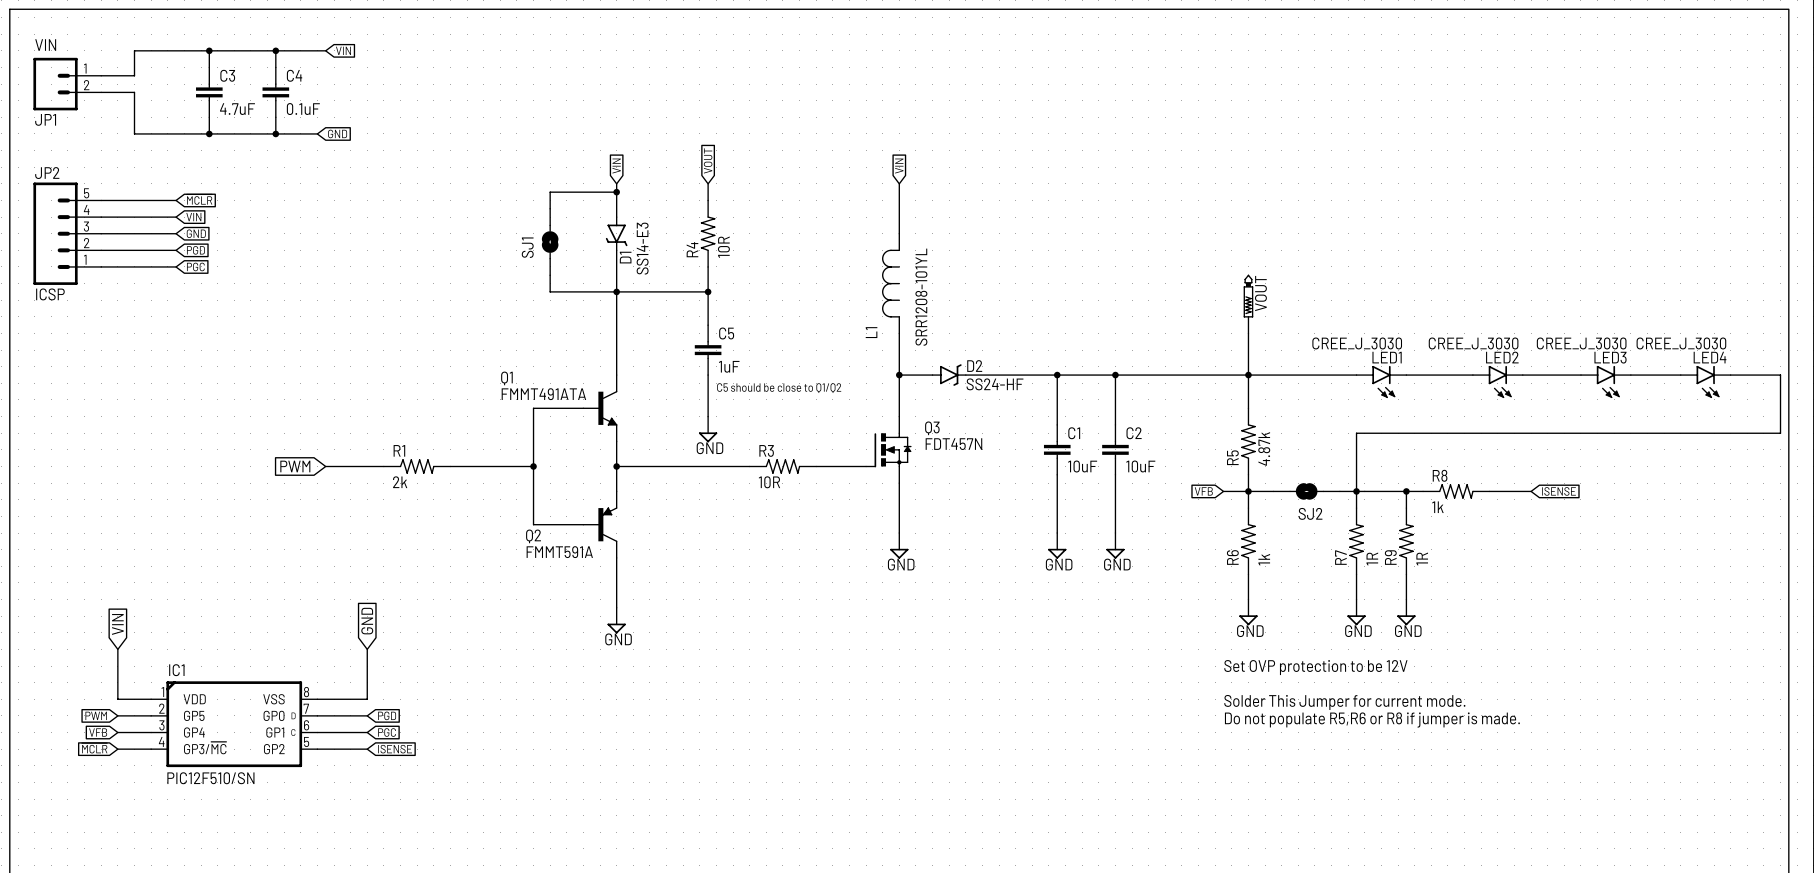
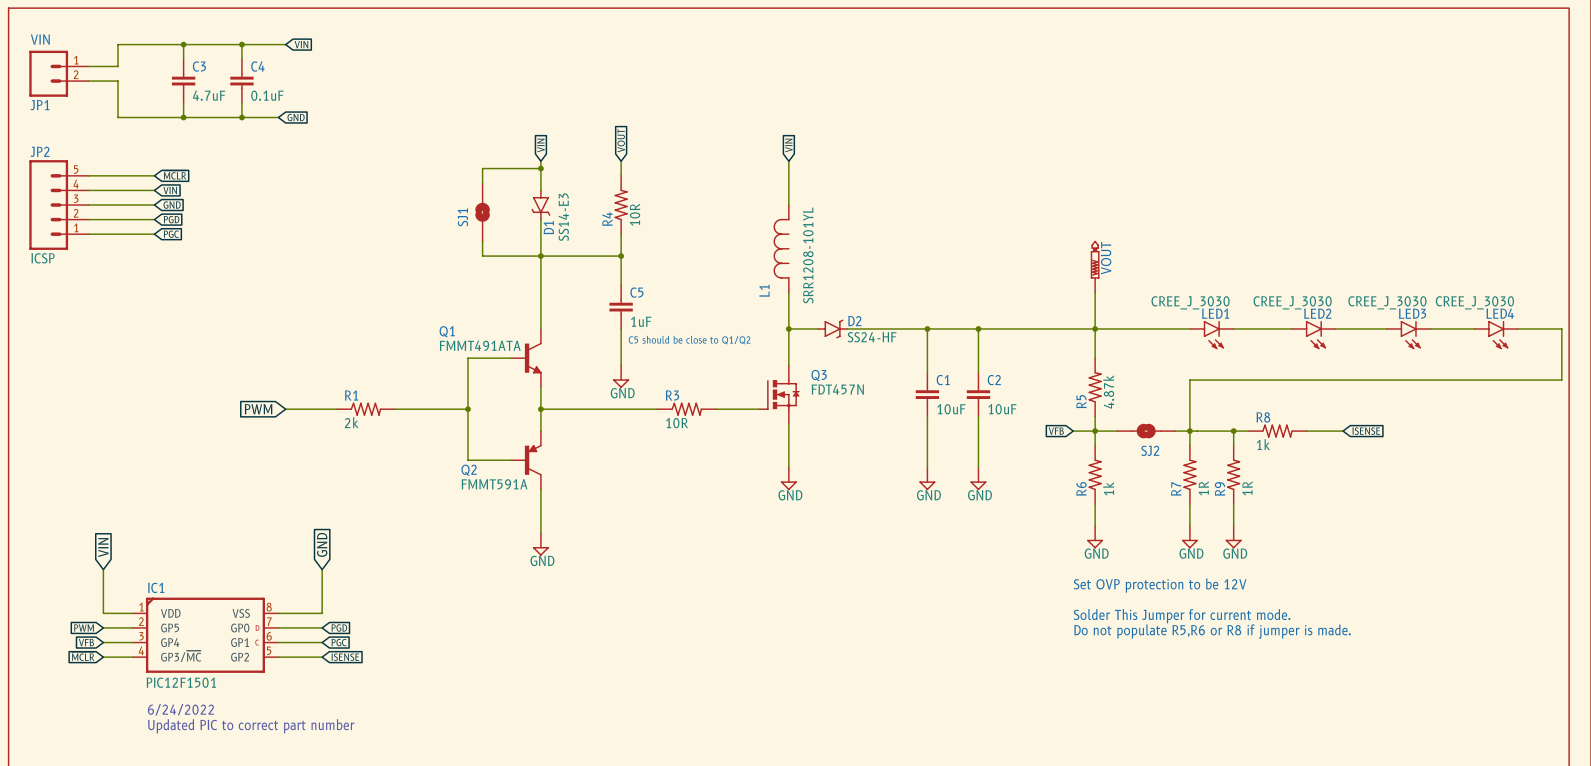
IC1 value: PIC12F510/SN (210, 778) -> PIC12F1501 (181, 682)
text: none -> 6/24/2022 (180, 709)
text: none -> Updated PIC to correct part number (251, 726)

